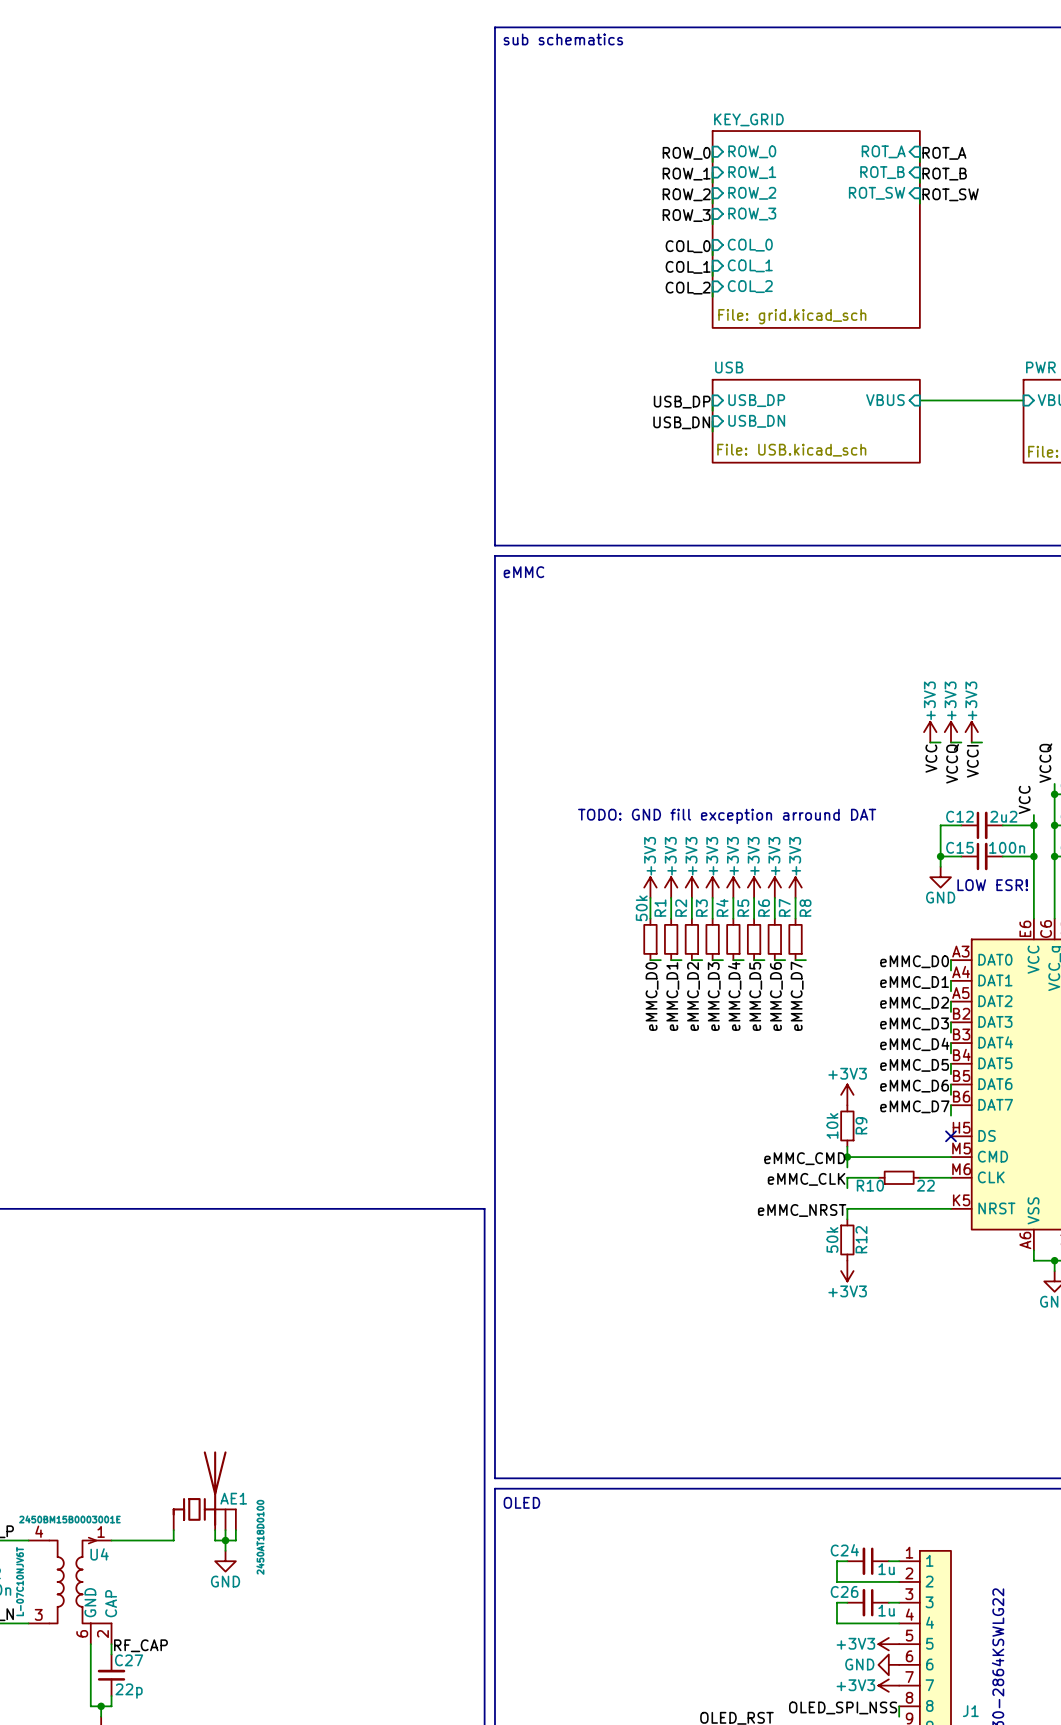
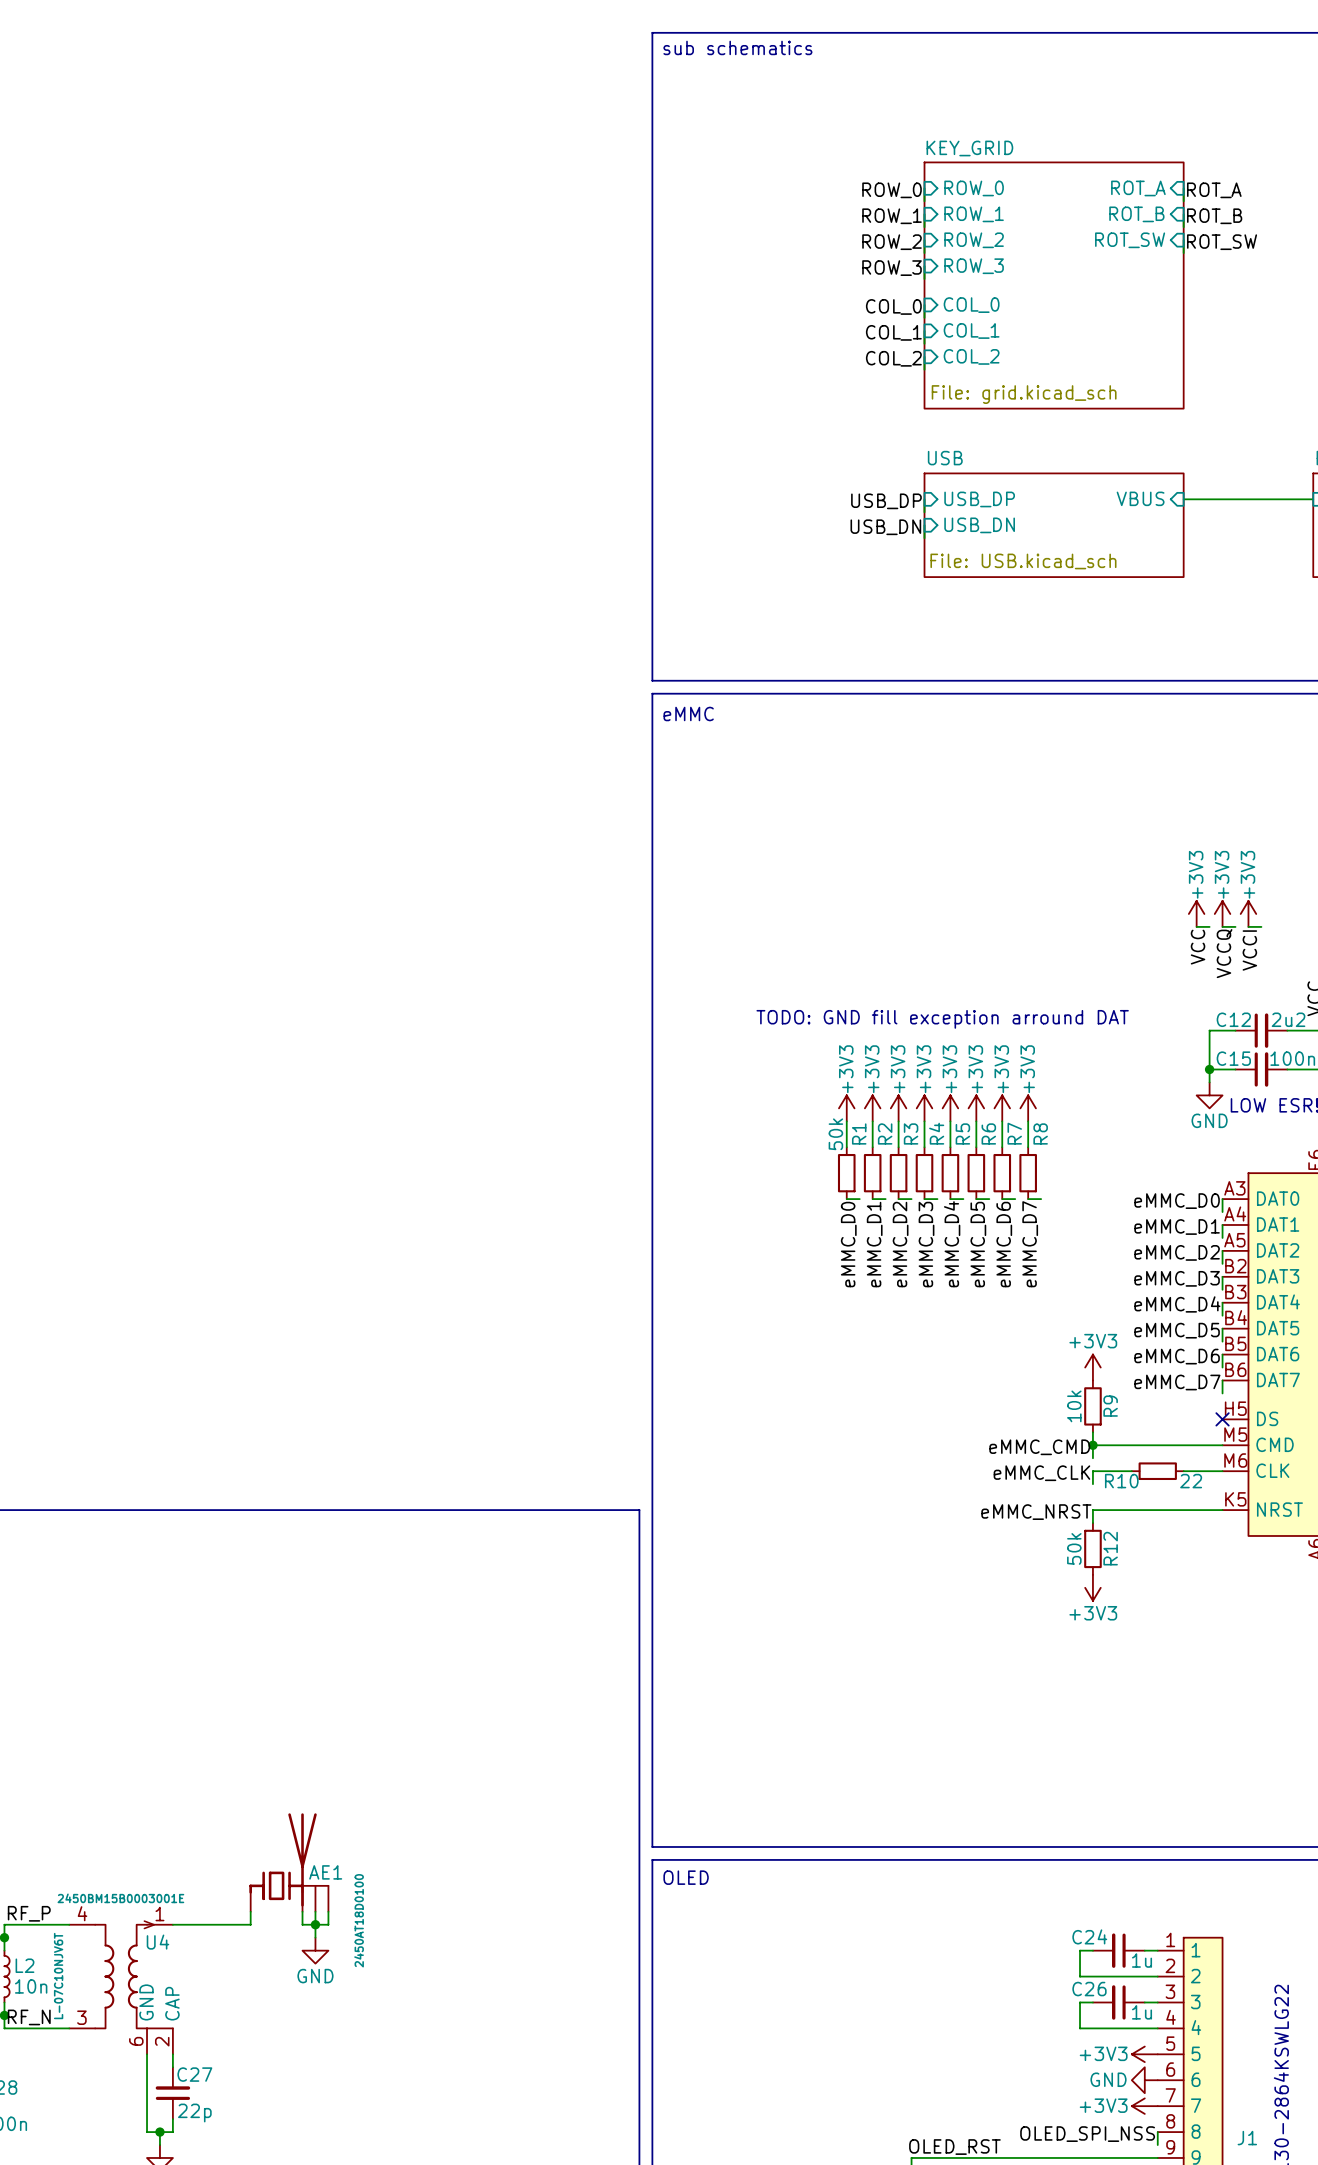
label: RF_CAP (140, 1645) -> none

